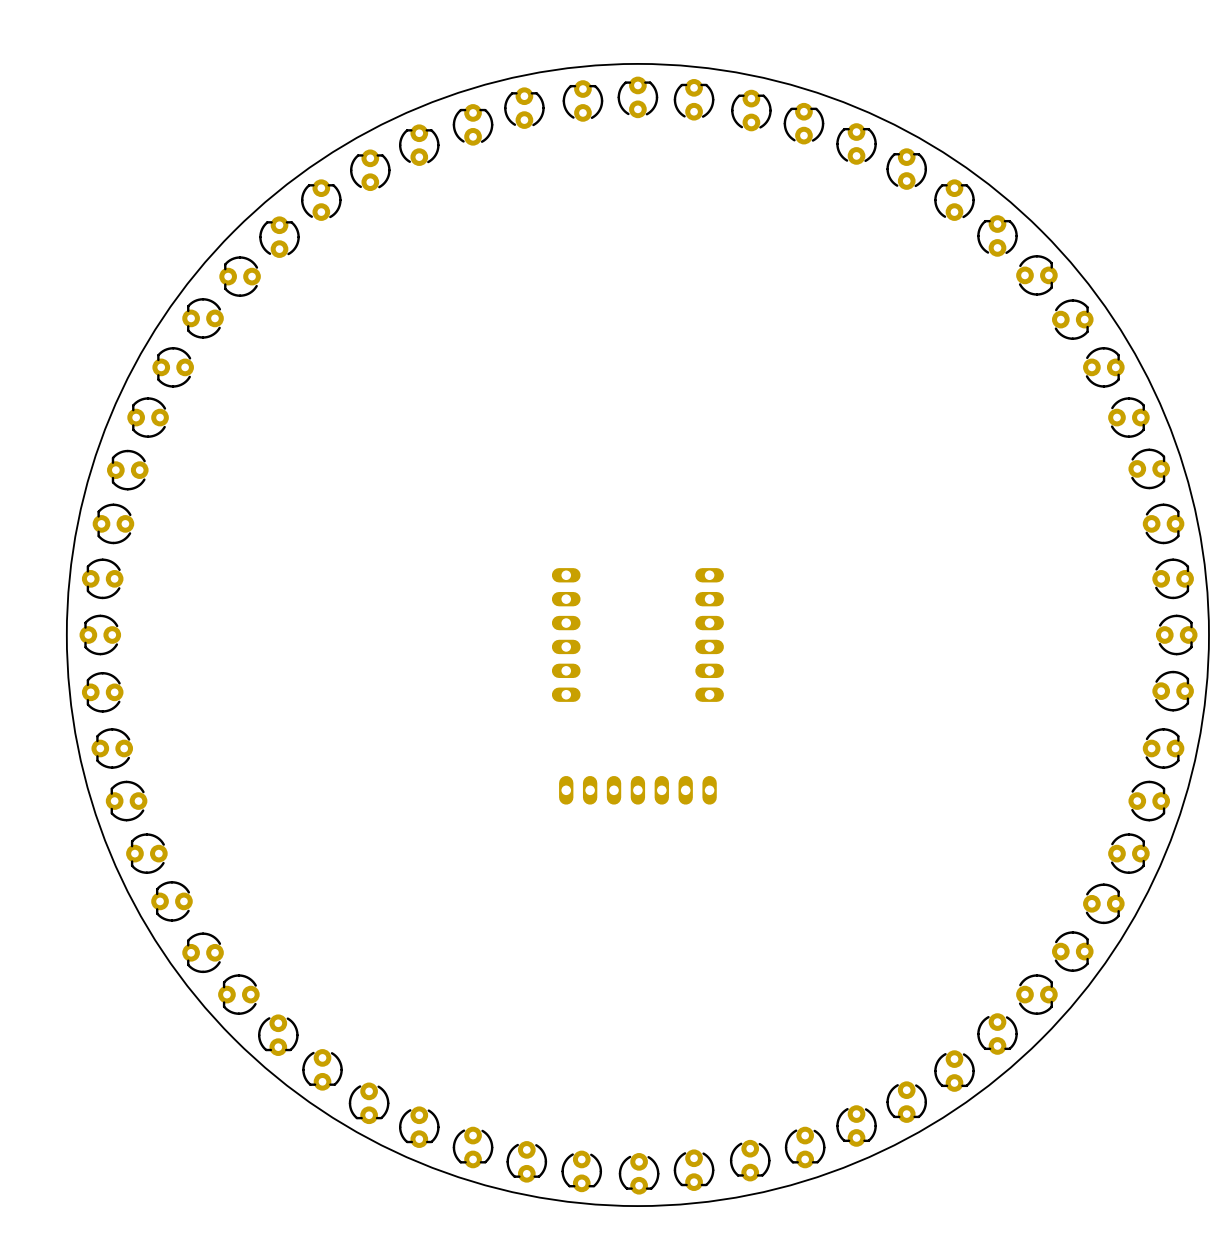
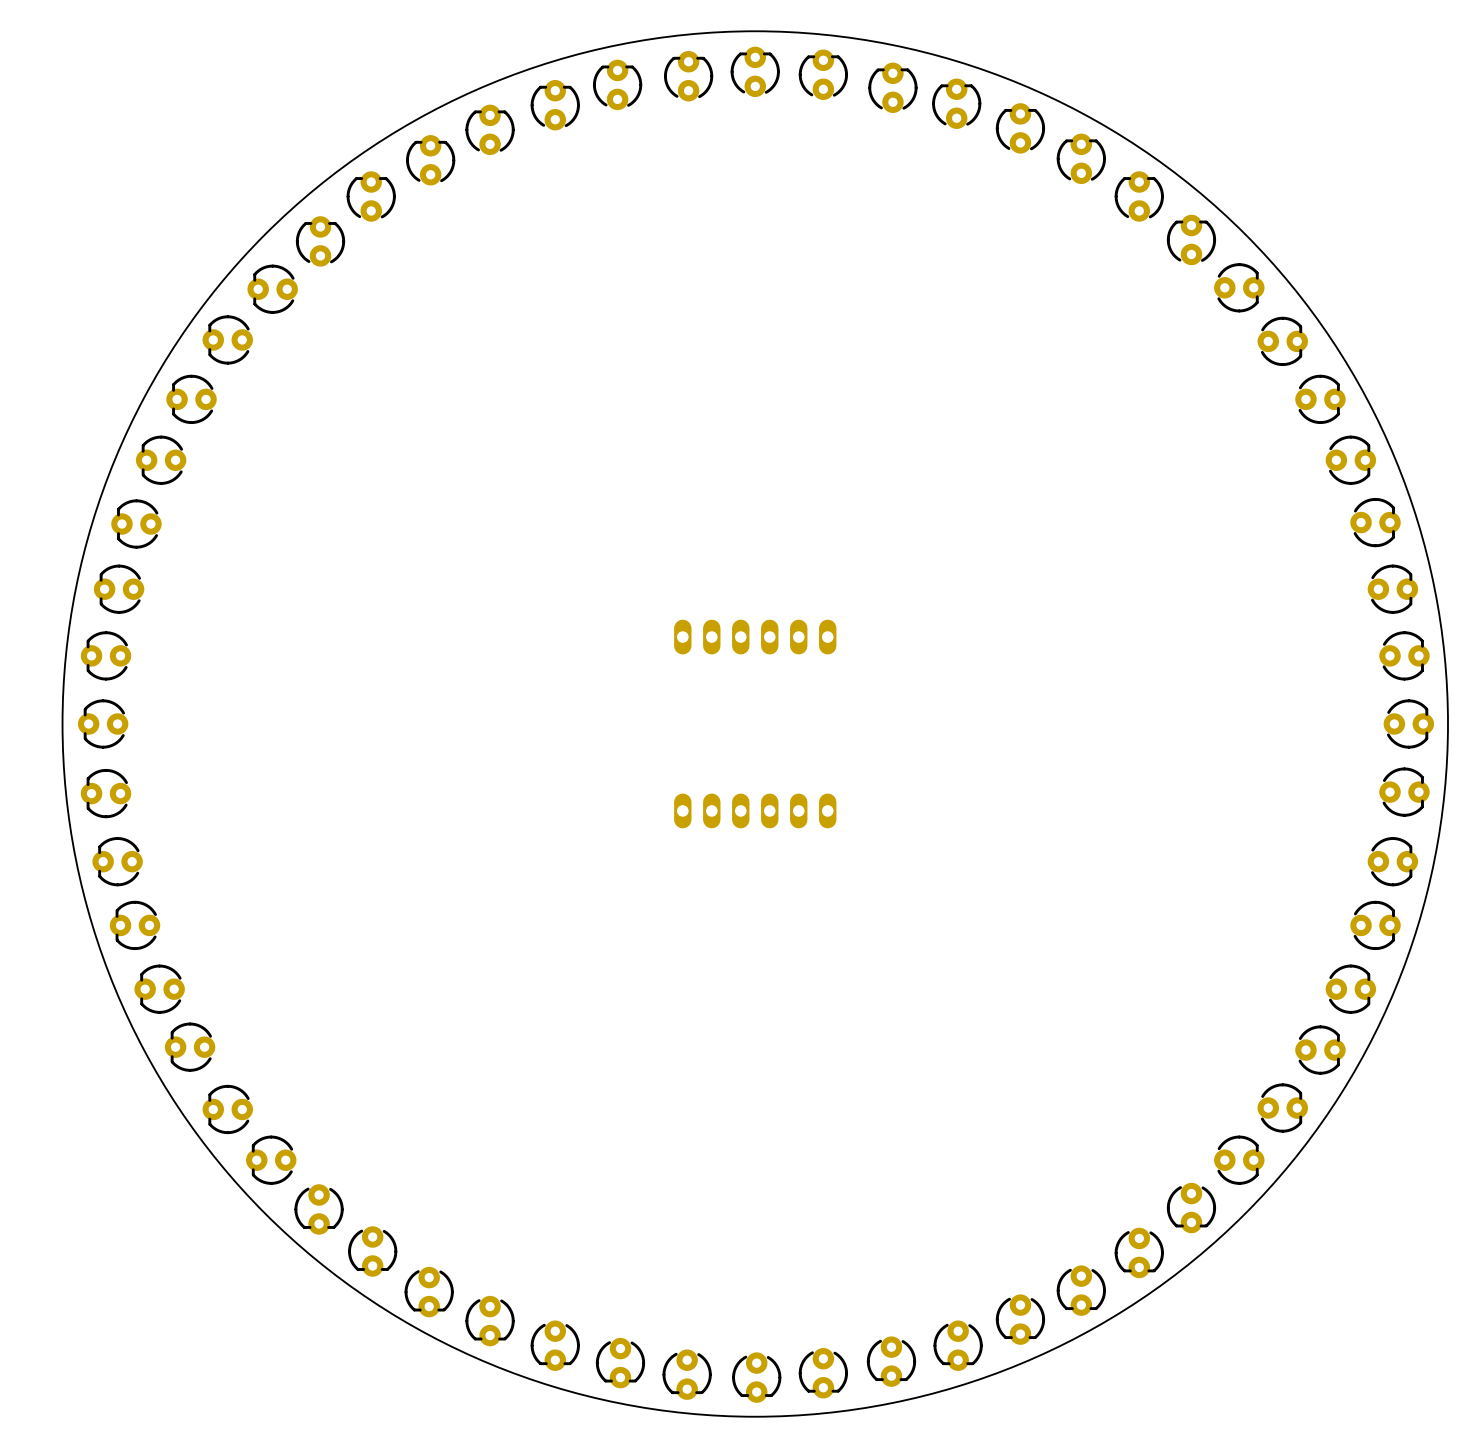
part: none -> (755, 637)
part: (566, 634) -> none
part: (709, 634) -> none
part: none -> (755, 810)
part: (637, 790) -> none

